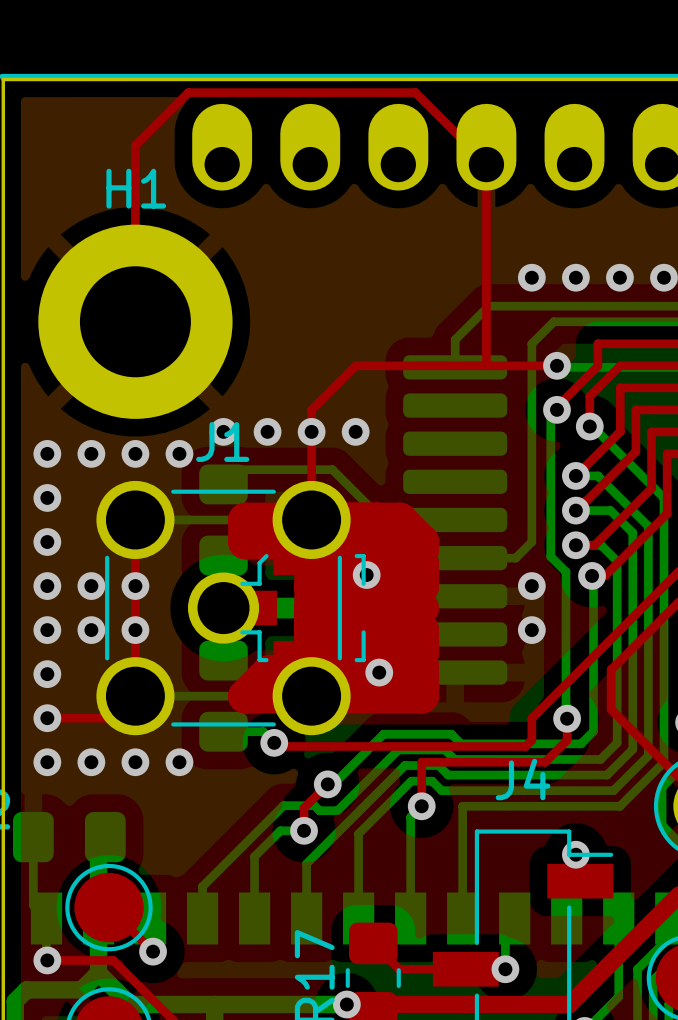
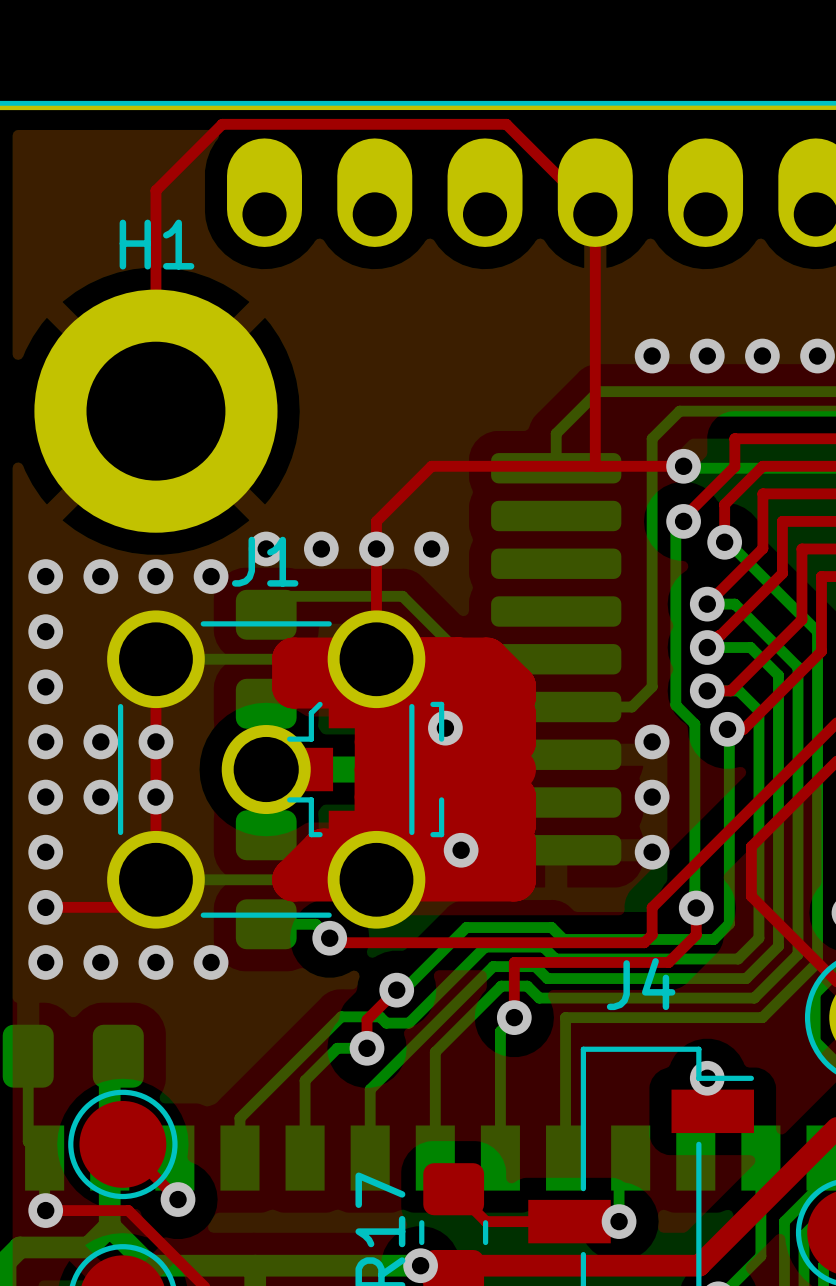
via: none -> (652, 852)

